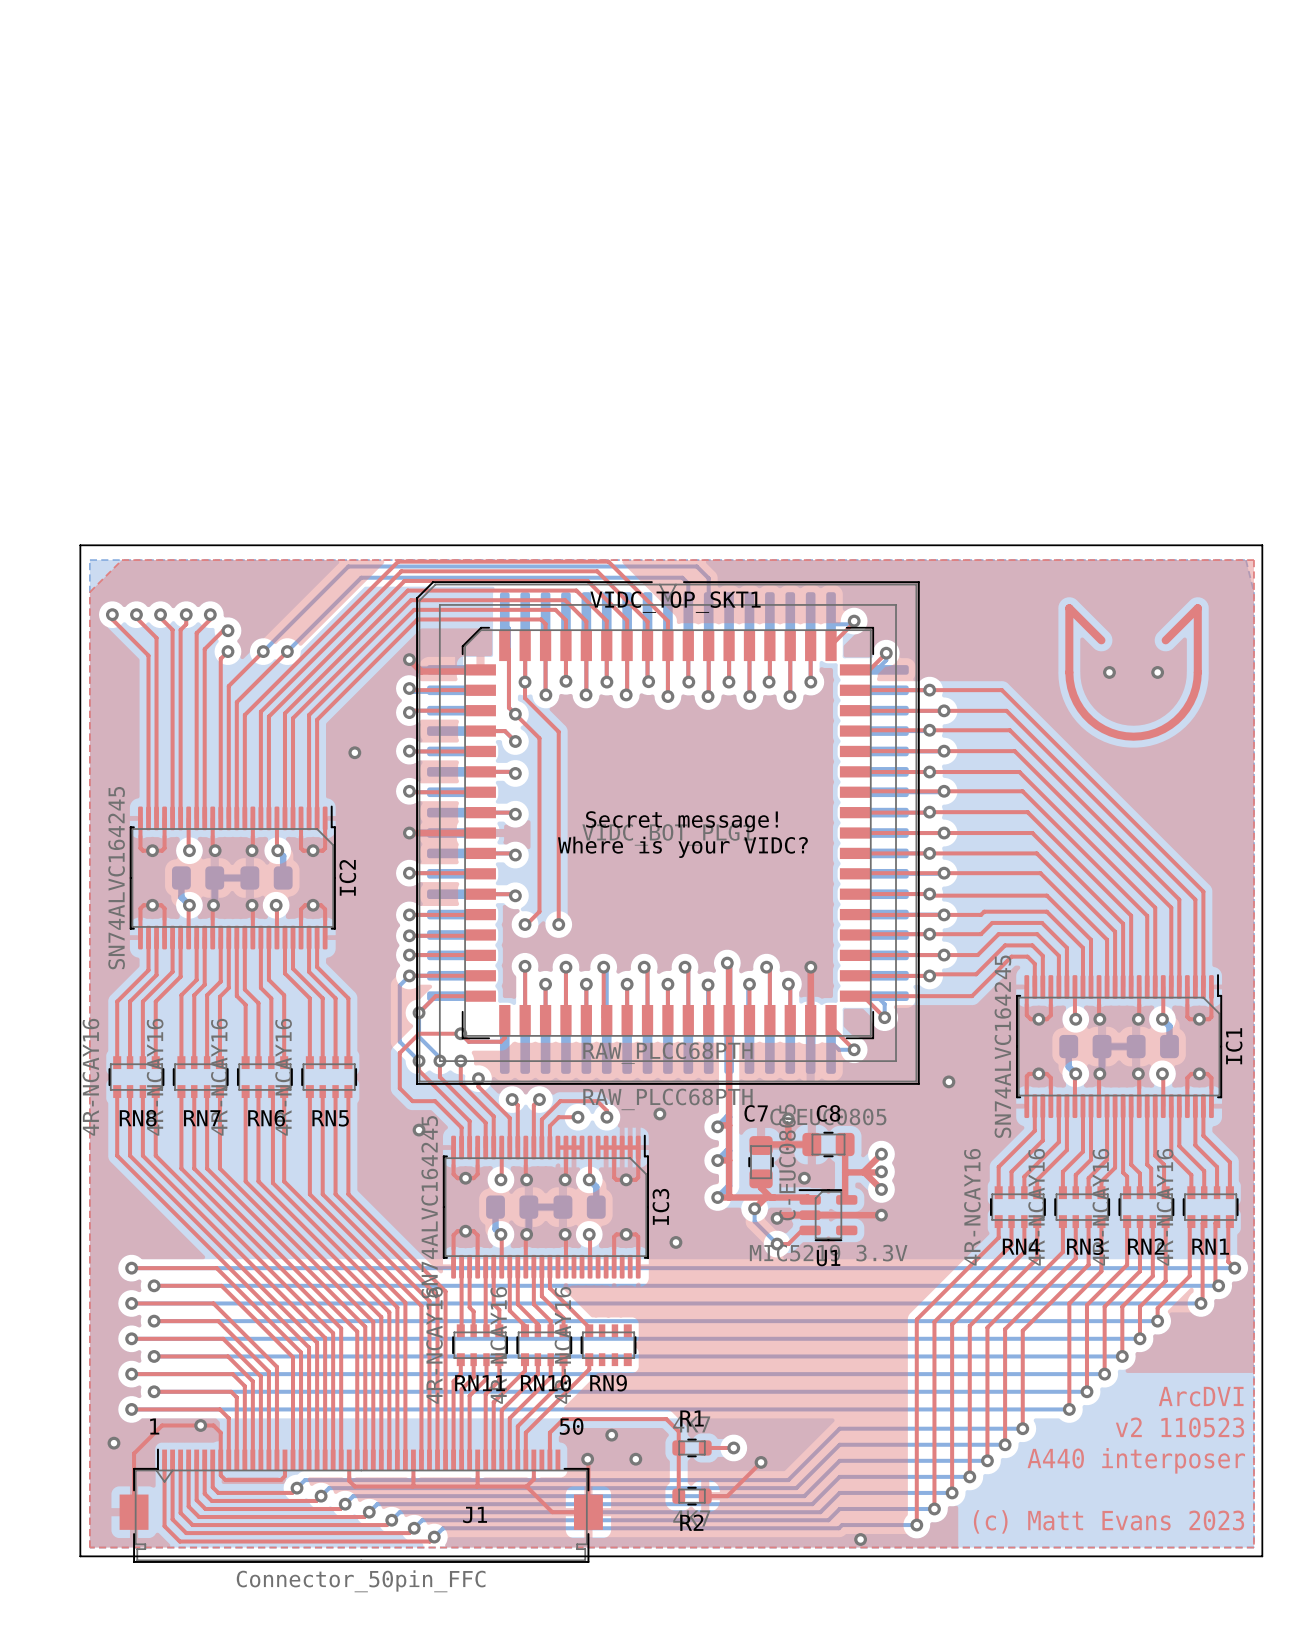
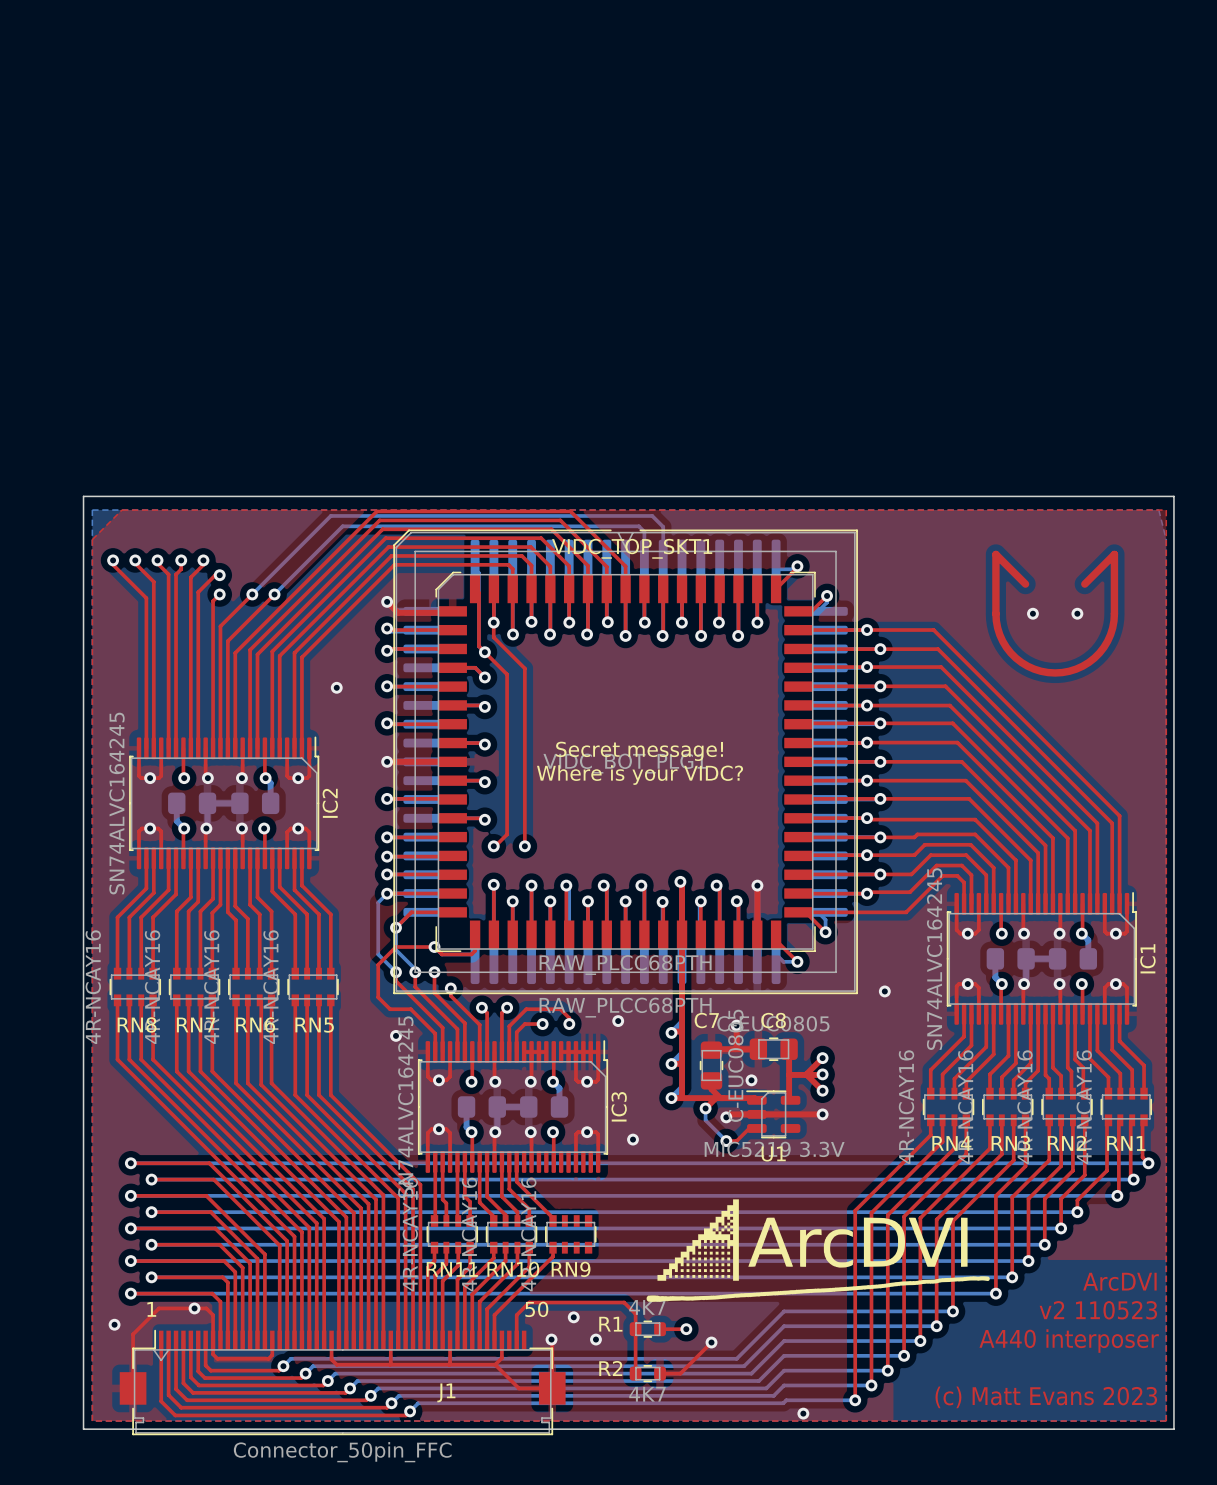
drawing: none -> [646, 1199, 990, 1302]
R1 name position: R1 (692, 1418) -> R1 (610, 1324)
R2 name position: R2 (691, 1522) -> R2 (610, 1368)

